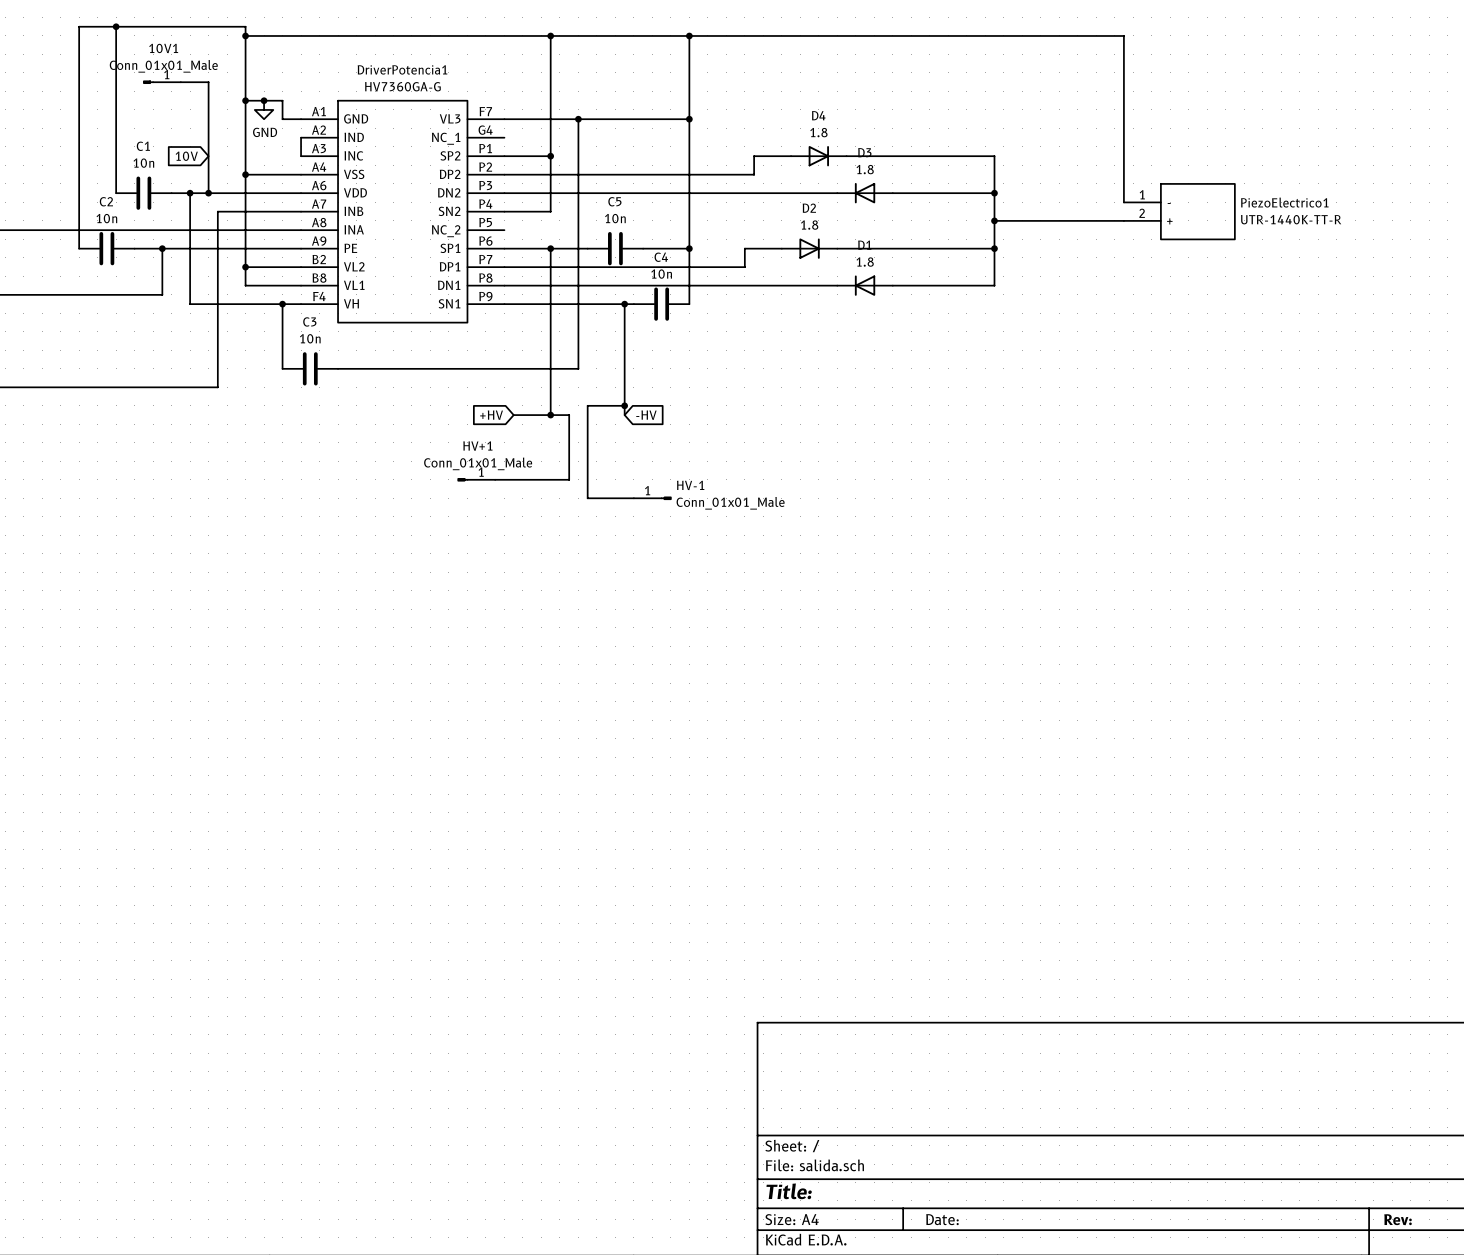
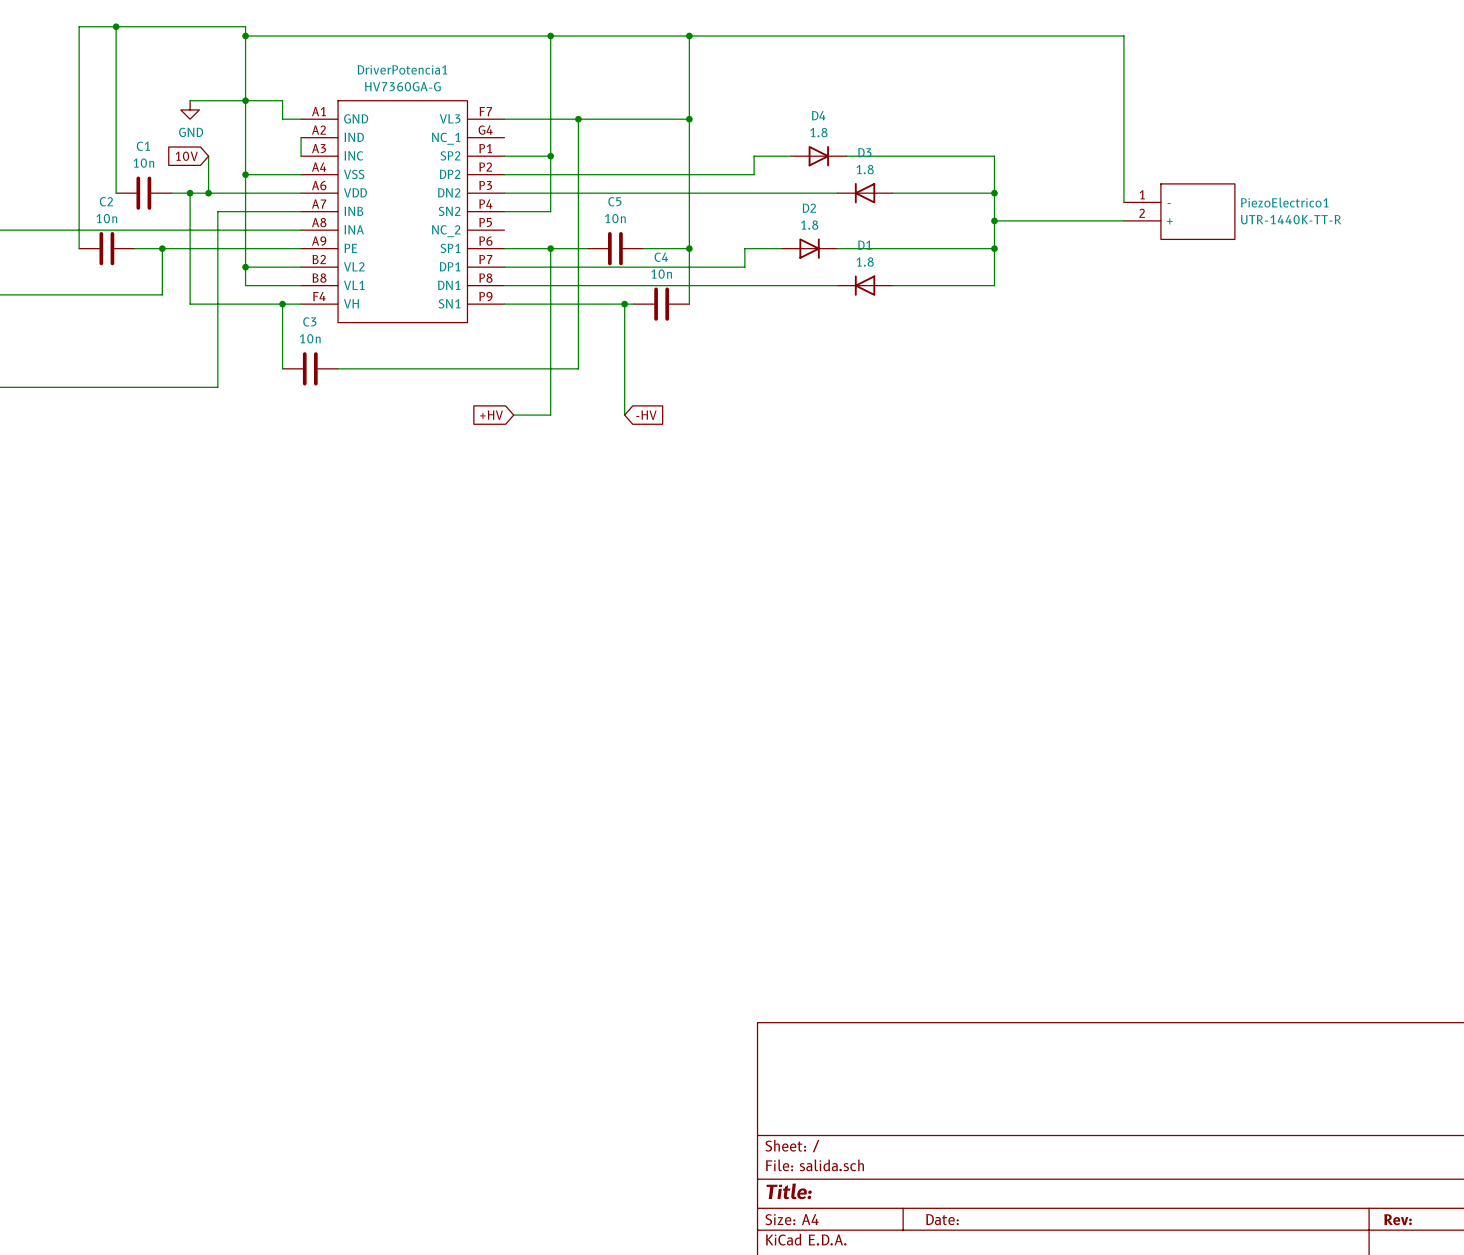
10V1: Conn_01x01_Male (162, 82) -> none
wire: (180, 82) (208, 82) (208, 156) -> none
wire: none -> (190, 100) (245, 100)
junction: (264, 100) -> none
power symbol position: GND (264, 109) -> GND (190, 109)
wire: (624, 405) (587, 405) (587, 498) (633, 498) -> none
junction: (624, 405) -> none
wire: (550, 415) (569, 415) (569, 479) (495, 479) -> none
junction: (550, 415) -> none
HV+1: Conn_01x01_Male (476, 479) -> none
HV-1: Conn_01x01_Male (652, 498) -> none

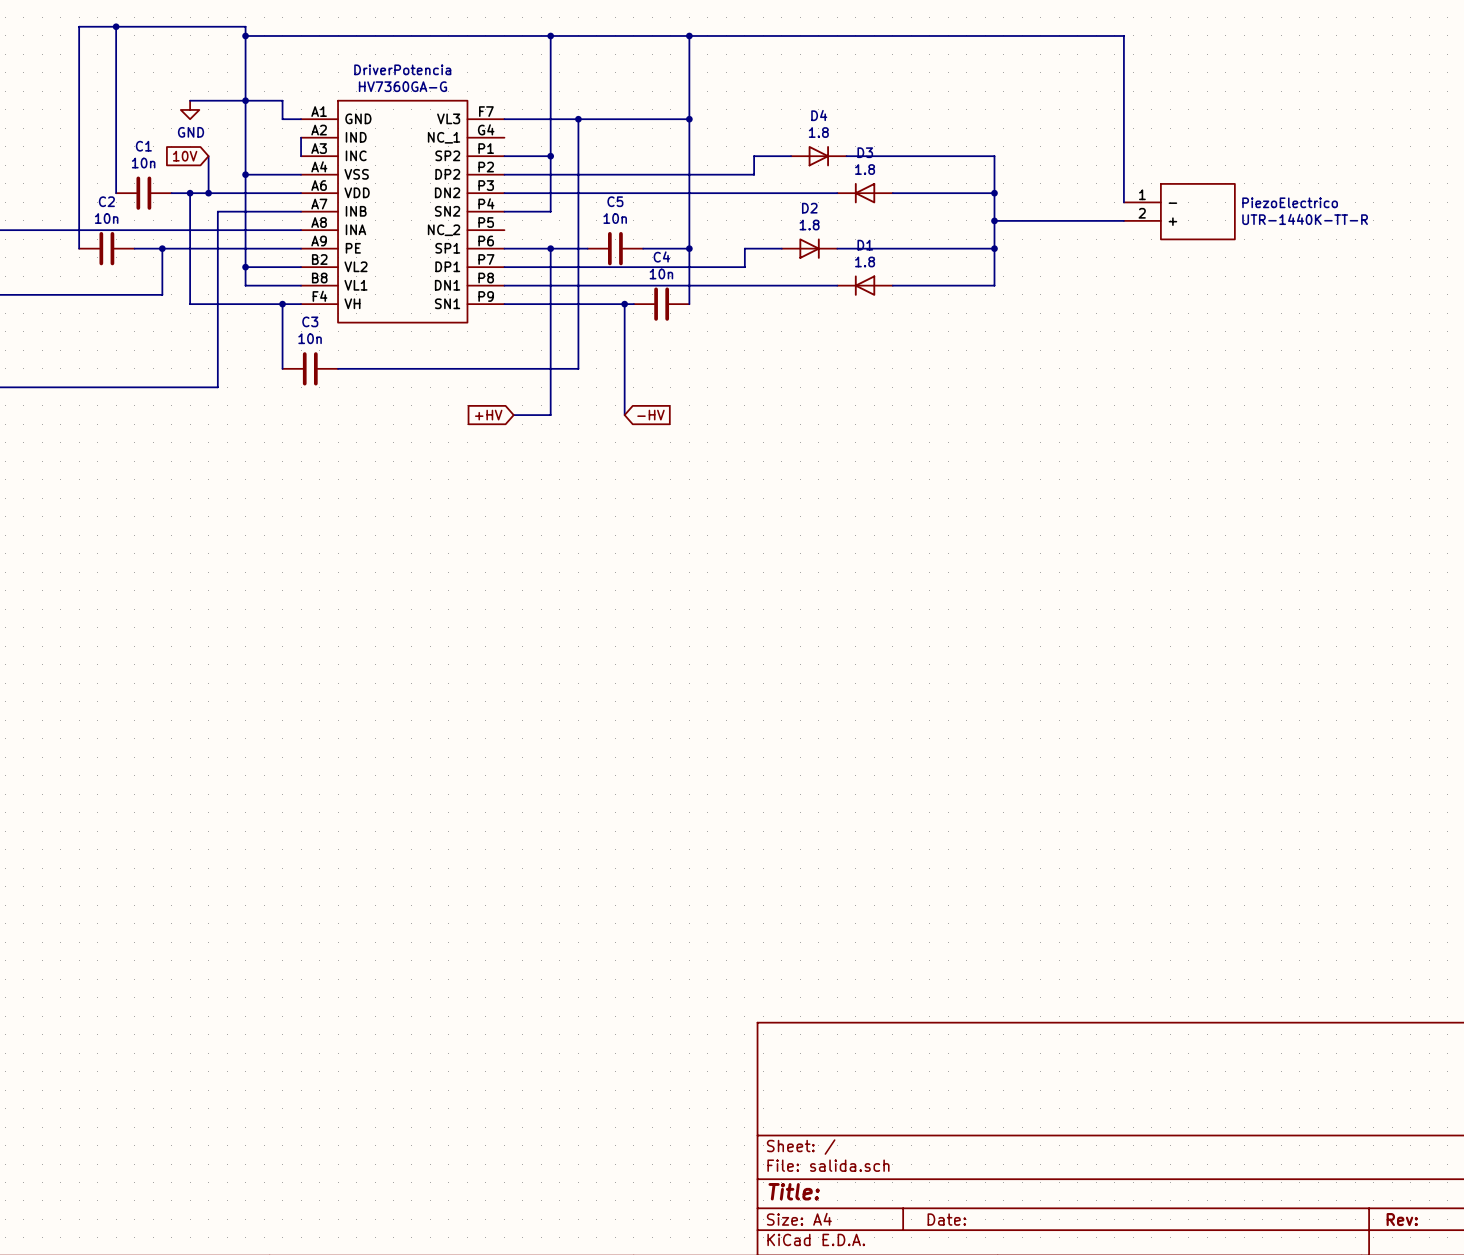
DriverPotencia1 name: DriverPotencia1 (402, 69) -> DriverPotencia (402, 69)
PiezoElectrico1 name: PiezoElectrico1 (1284, 202) -> PiezoElectrico (1290, 202)

